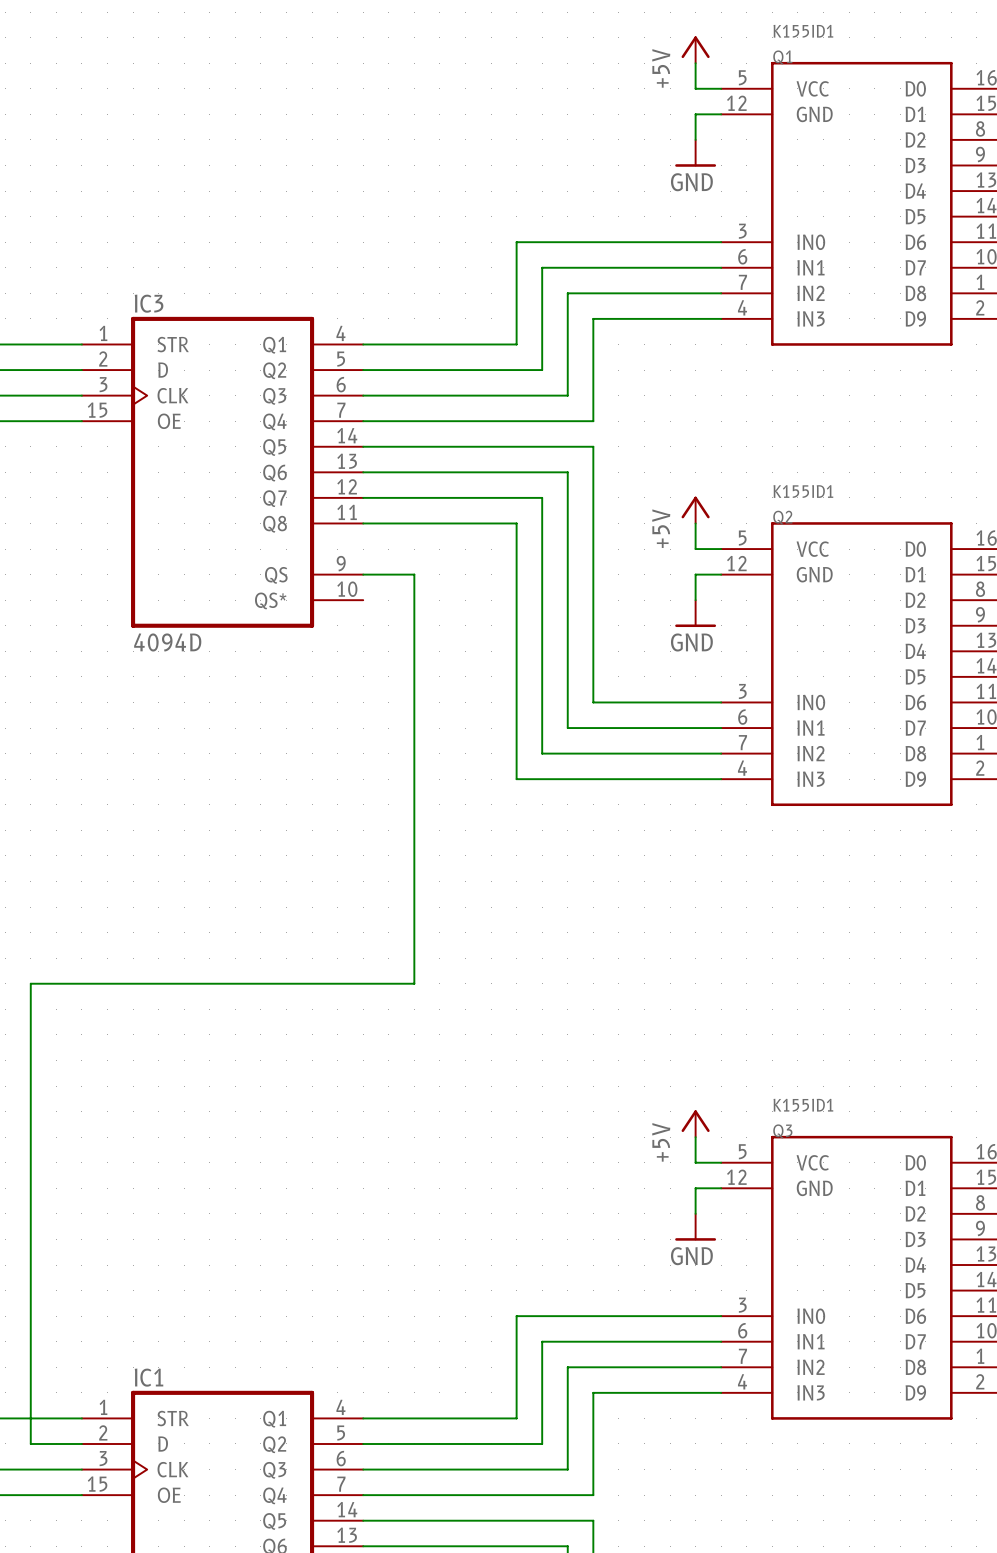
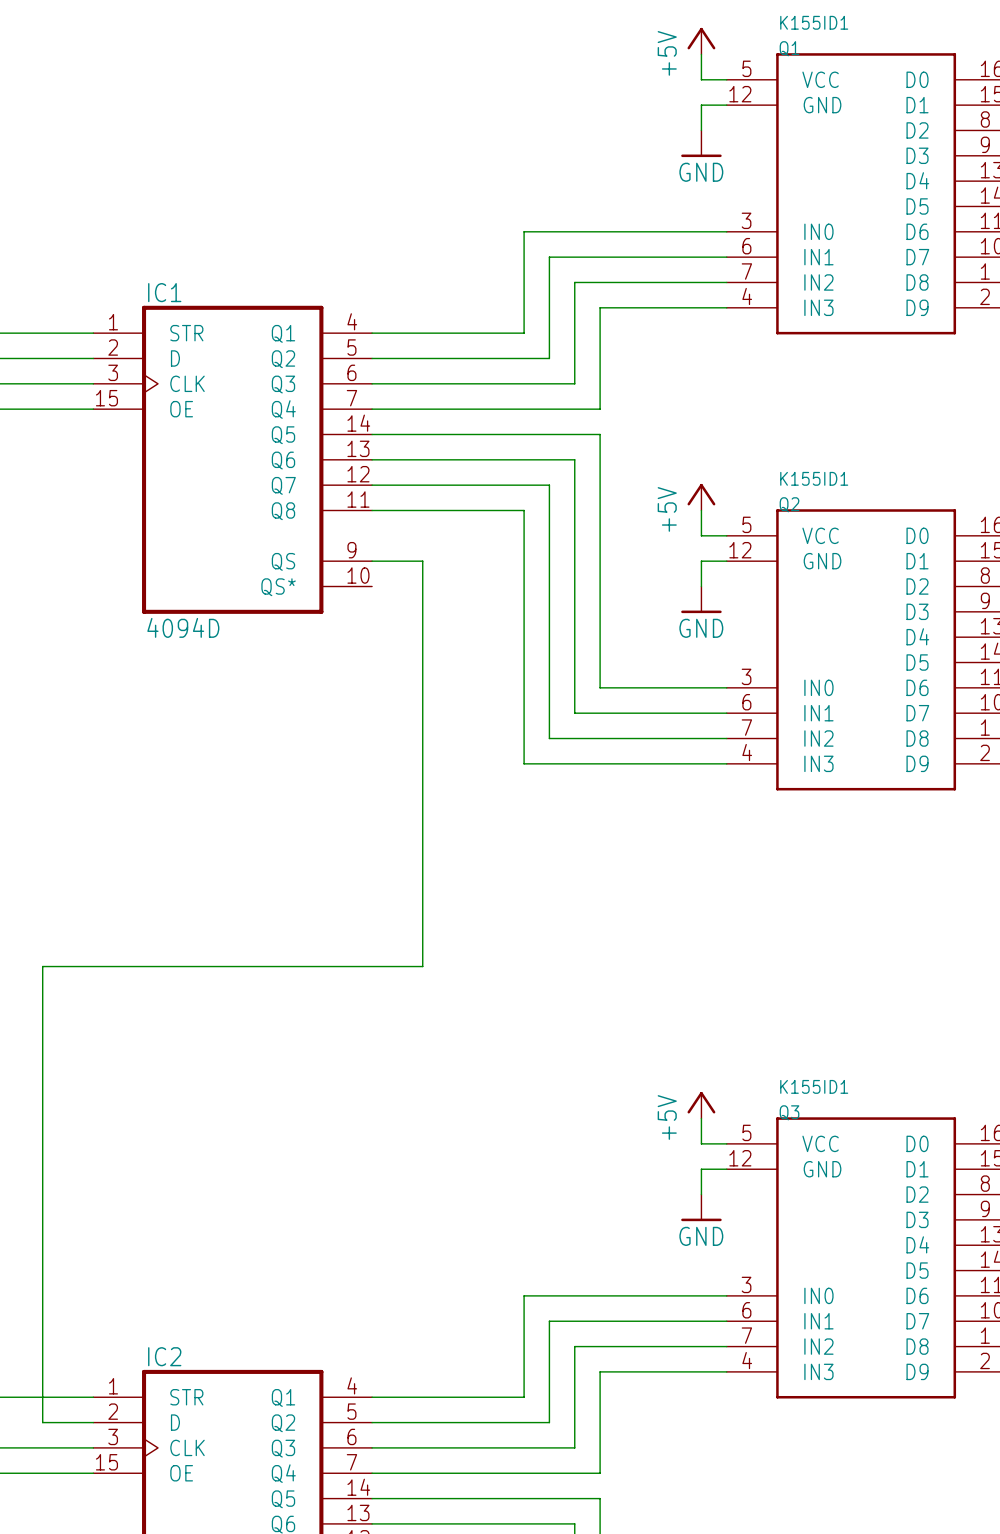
IC3 name: IC3 (149, 303) -> IC1 (164, 292)
IC1 name: IC1 (149, 1377) -> IC2 (164, 1356)

